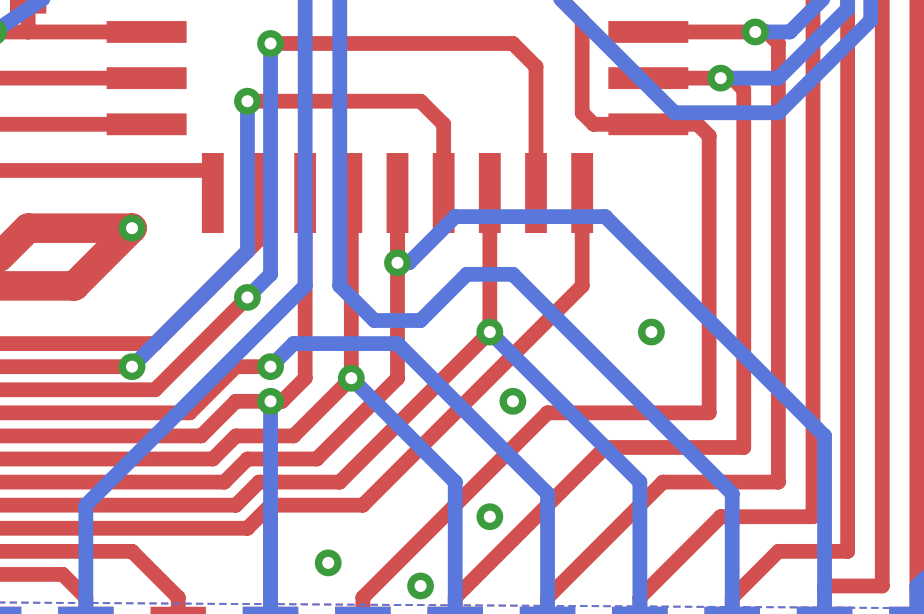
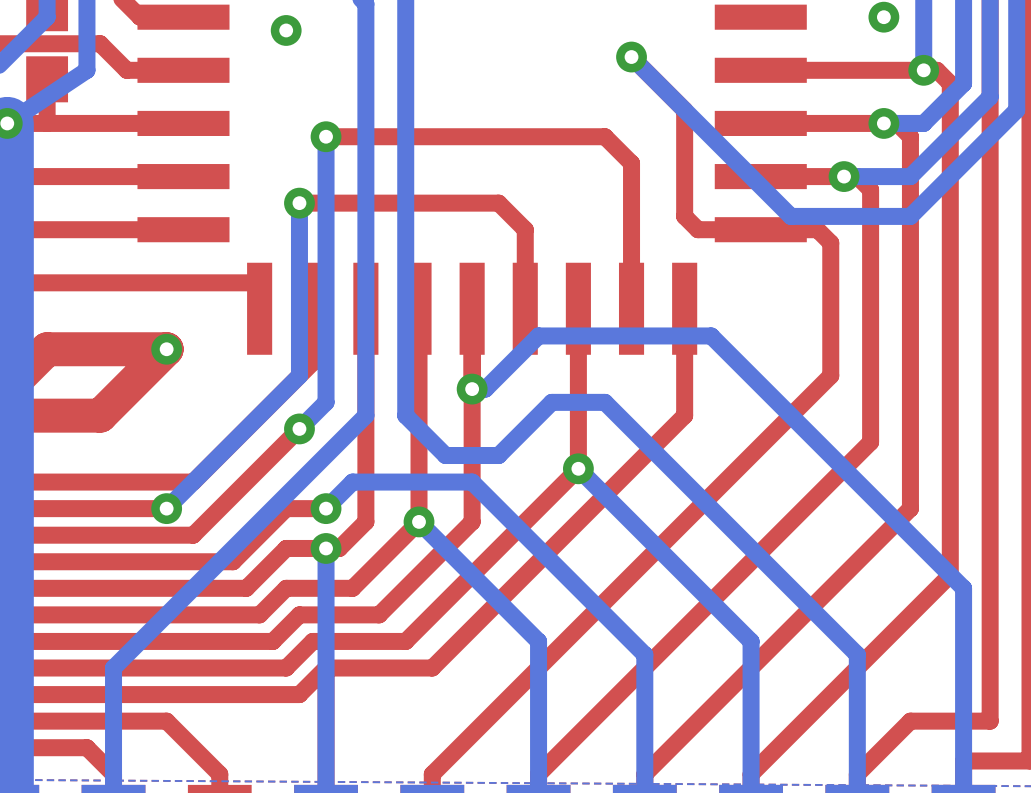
top track: (709, 251) (709, 412) (547, 412) -> (830, 375) (644, 561)
top track: (743, 308) (743, 447) (605, 447) -> (870, 442) (711, 601)
via: (651, 332) -> none
top track: (778, 366) (778, 482) (662, 482) -> (910, 508) (777, 641)
via: (512, 401) -> none
top track: (813, 424) (813, 516) (720, 516) -> (950, 575) (844, 681)
via: (489, 516) -> none
via: (328, 562) -> none
via: (420, 585) -> none

